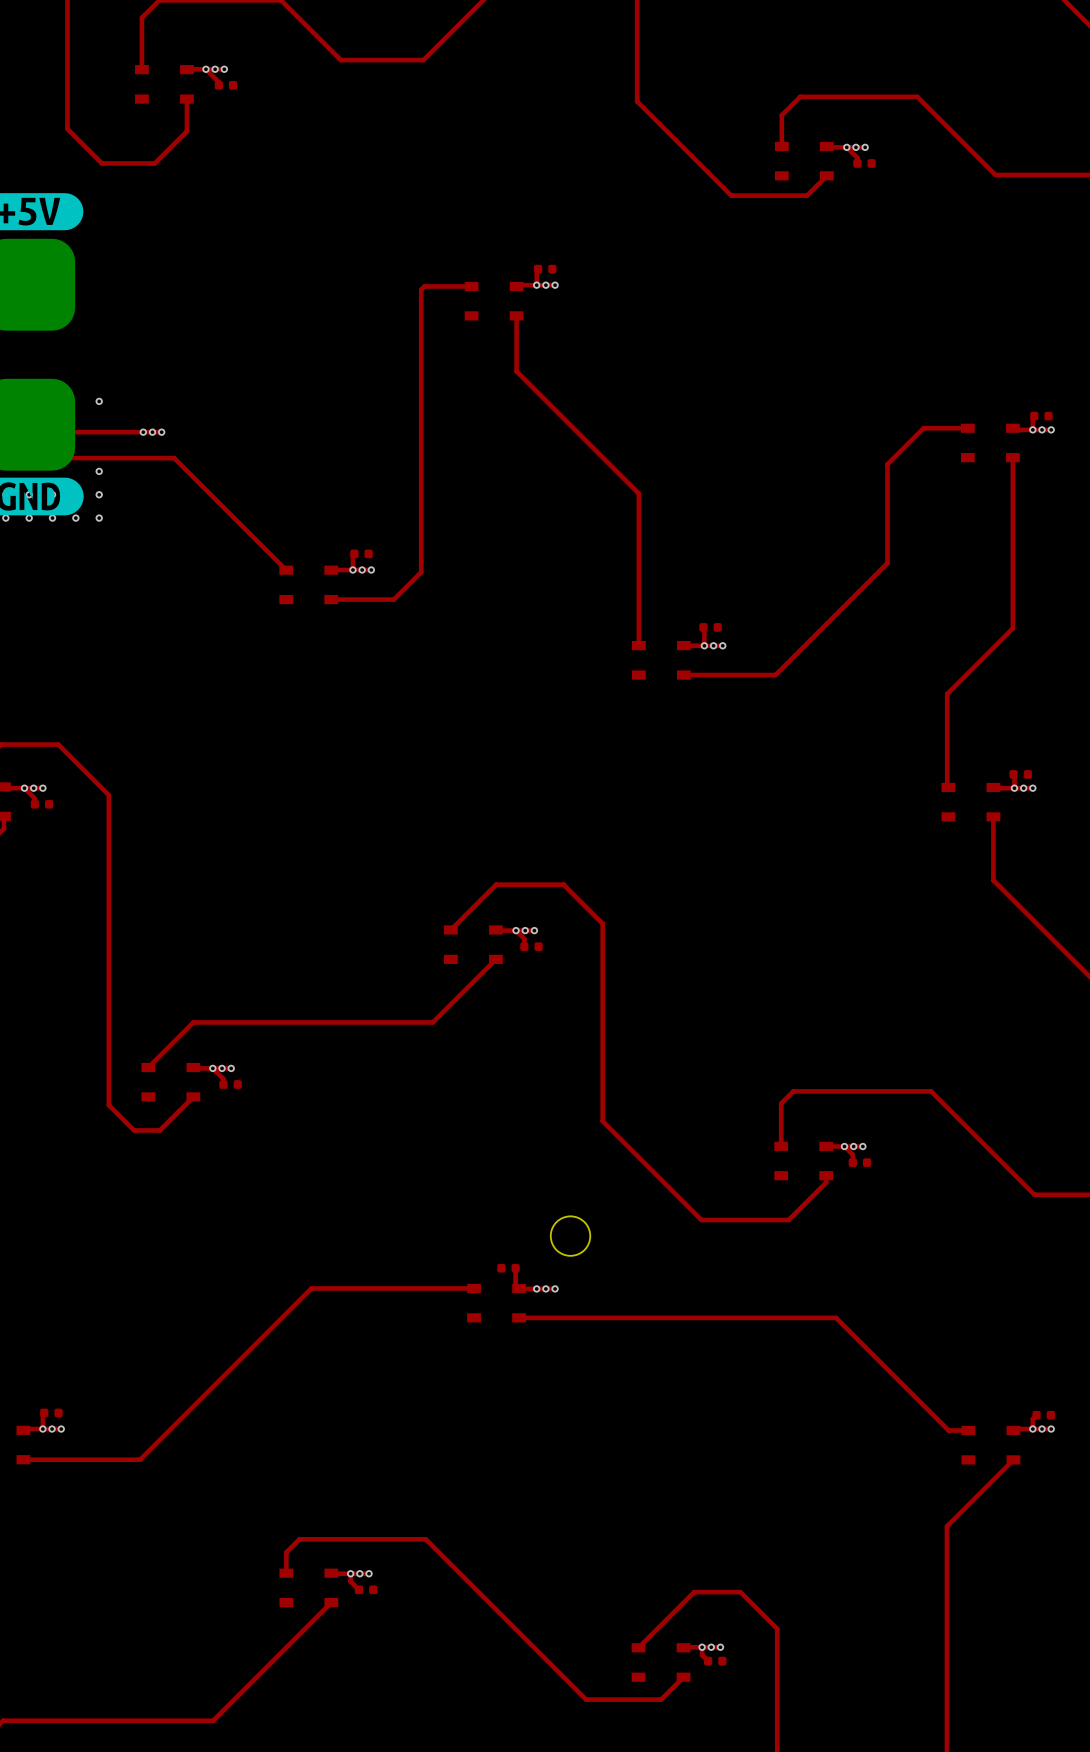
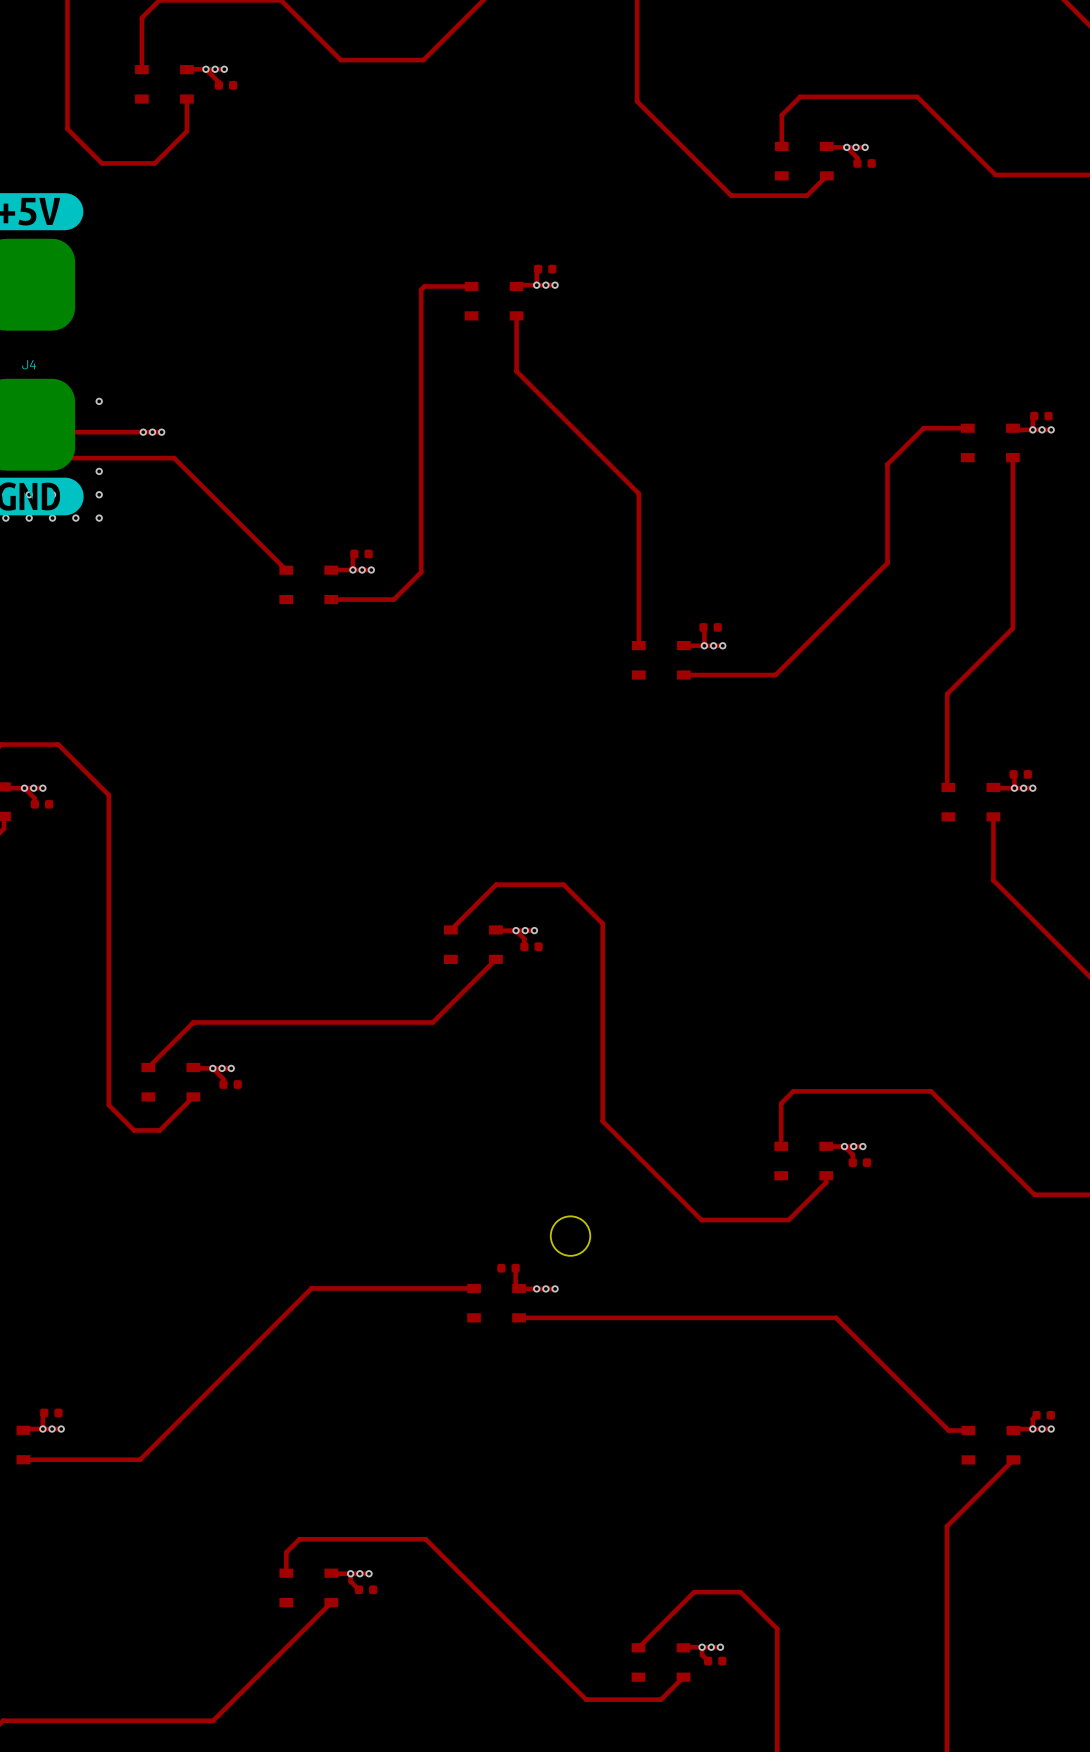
J4 name: none -> J4 (28, 364)

